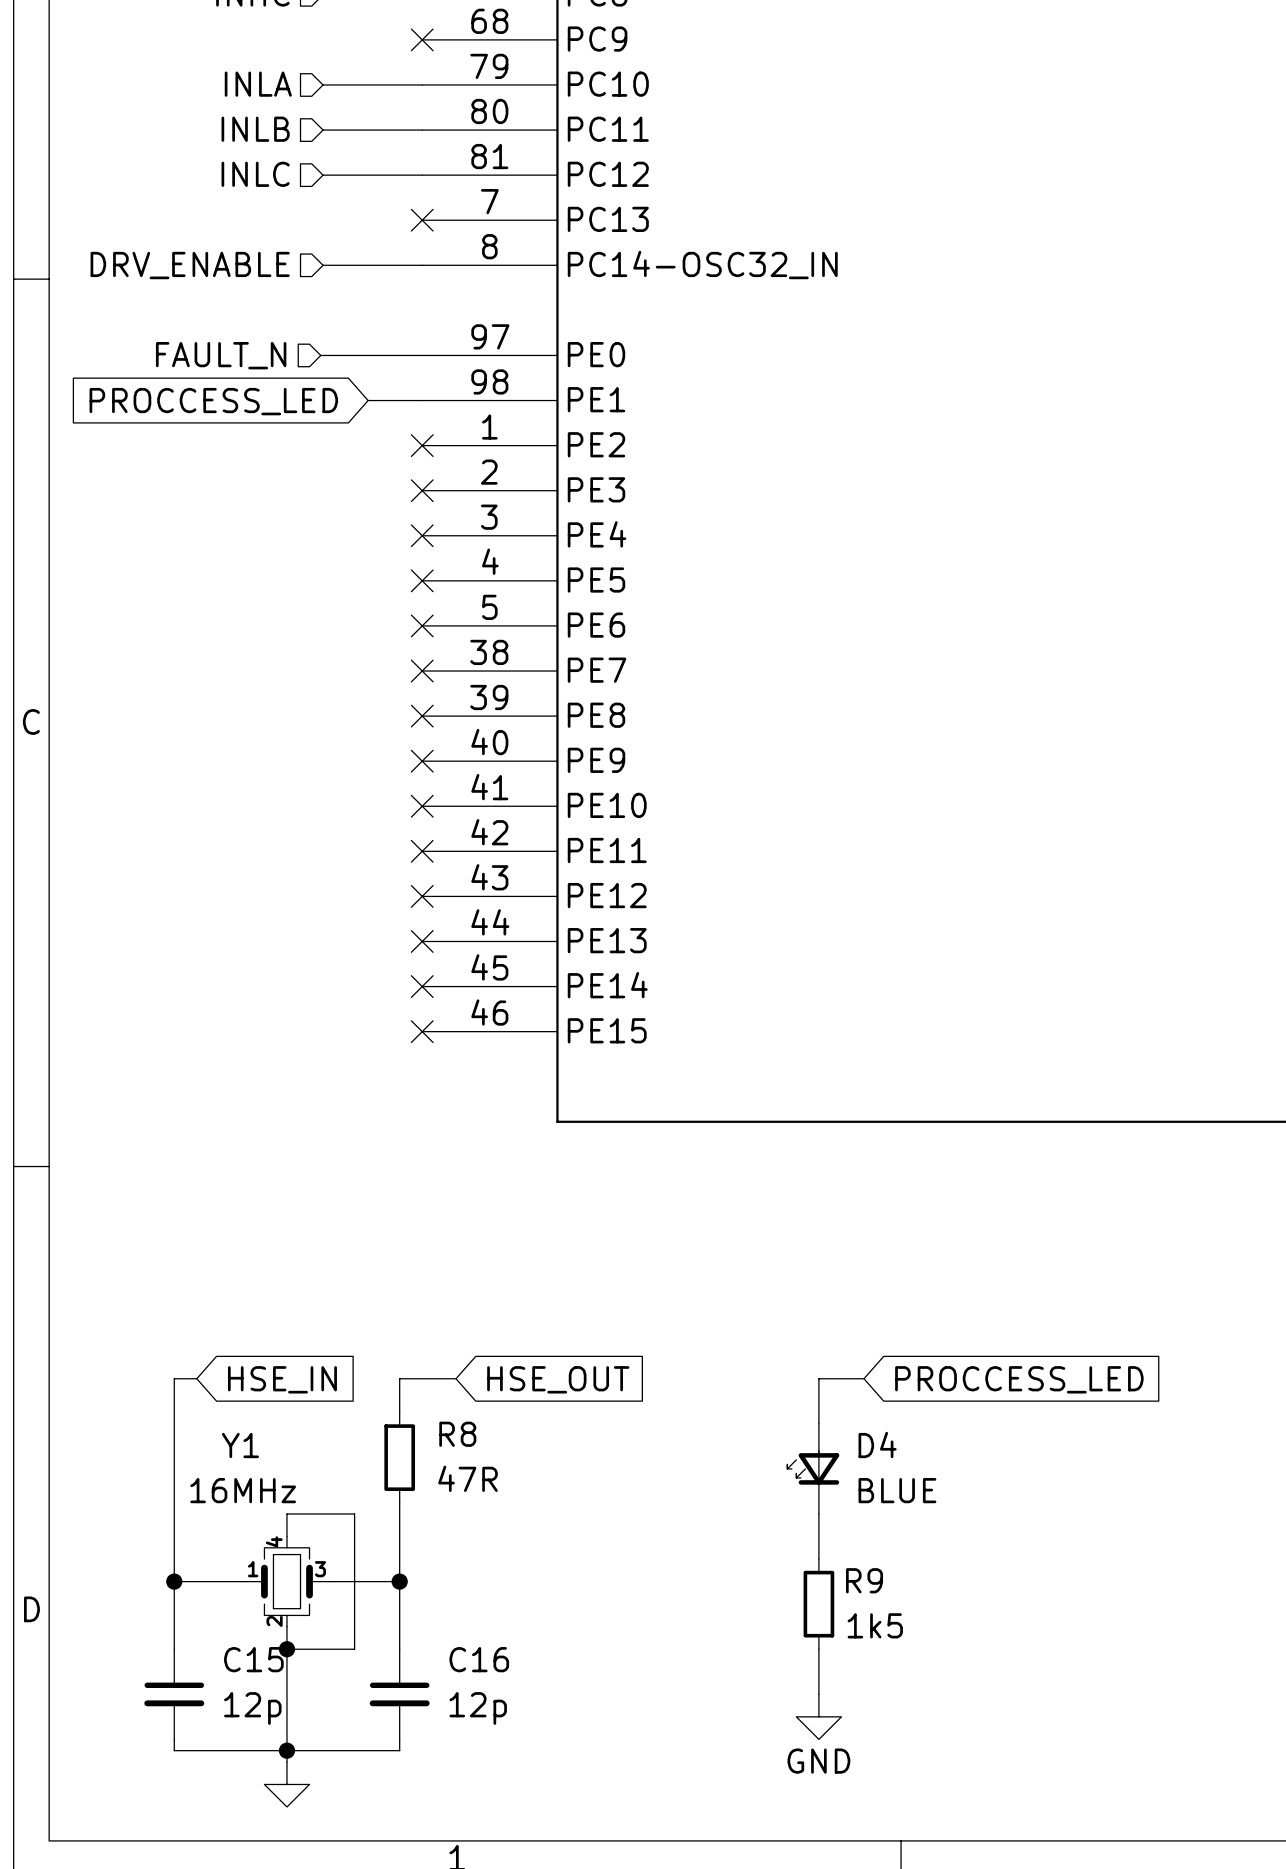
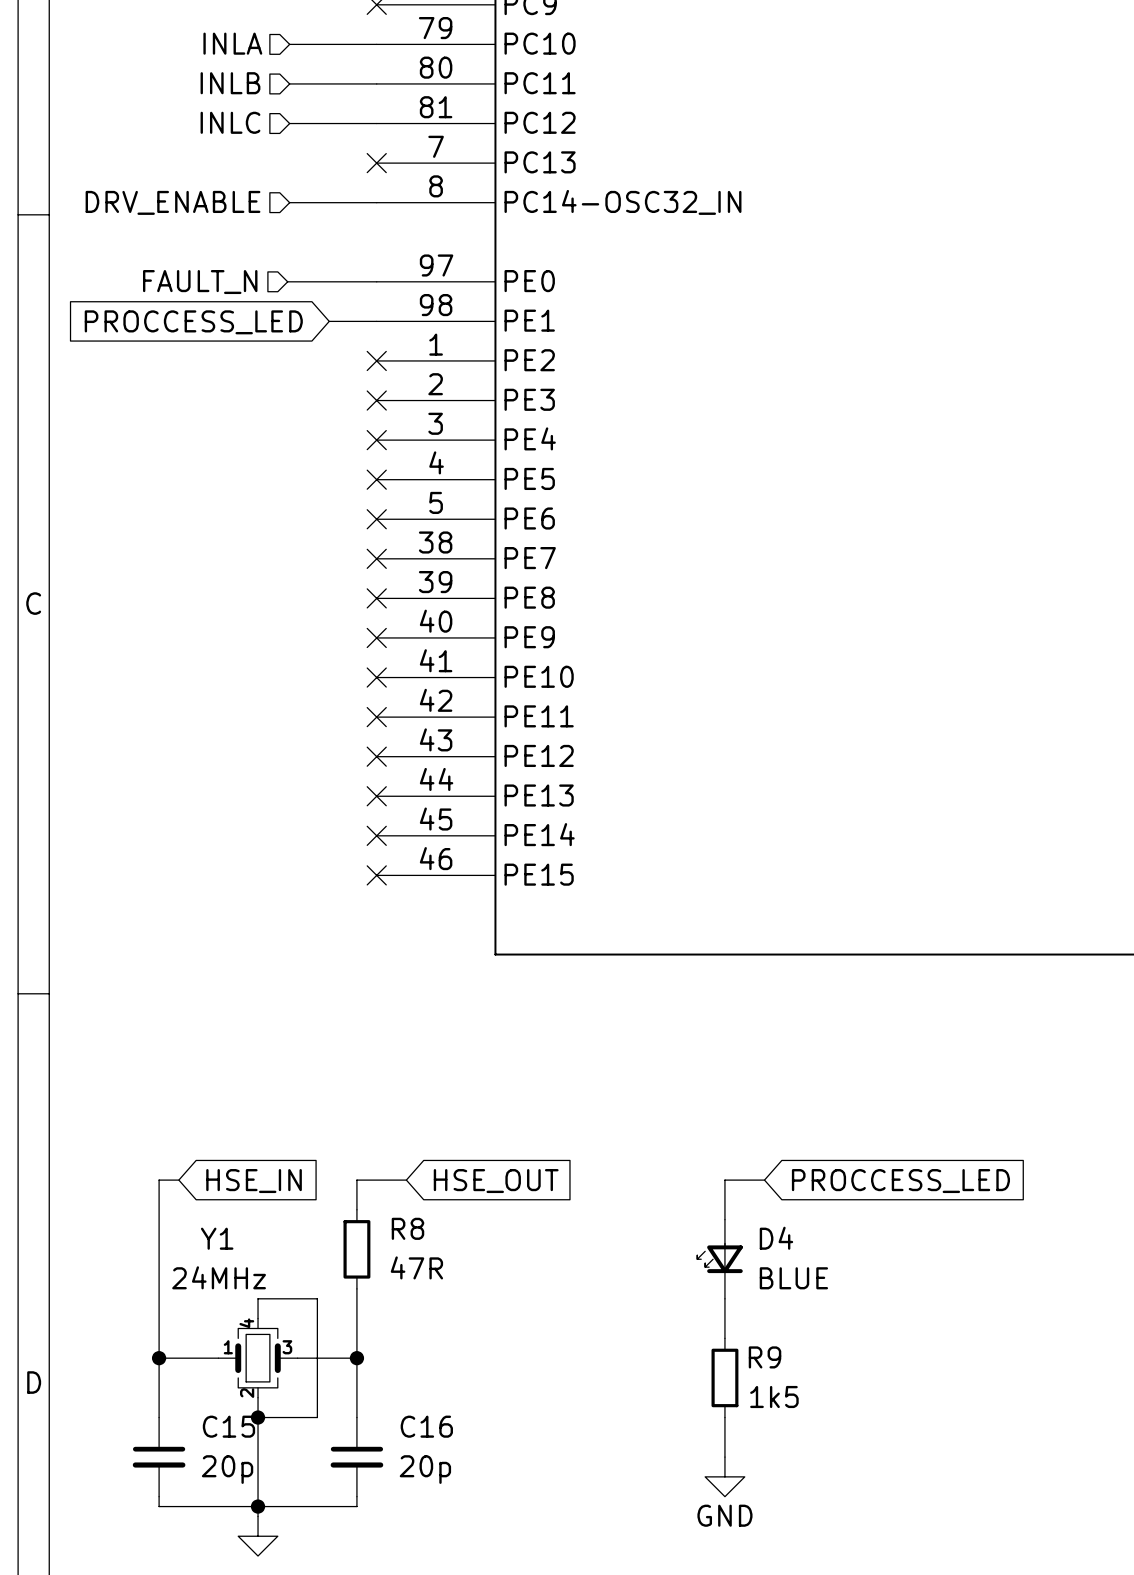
Y1 value: 16MHz (243, 1490) -> 24MHz (219, 1277)
C15 value: 12p (252, 1708) -> 20p (227, 1469)
C16 value: 12p (478, 1708) -> 20p (425, 1469)

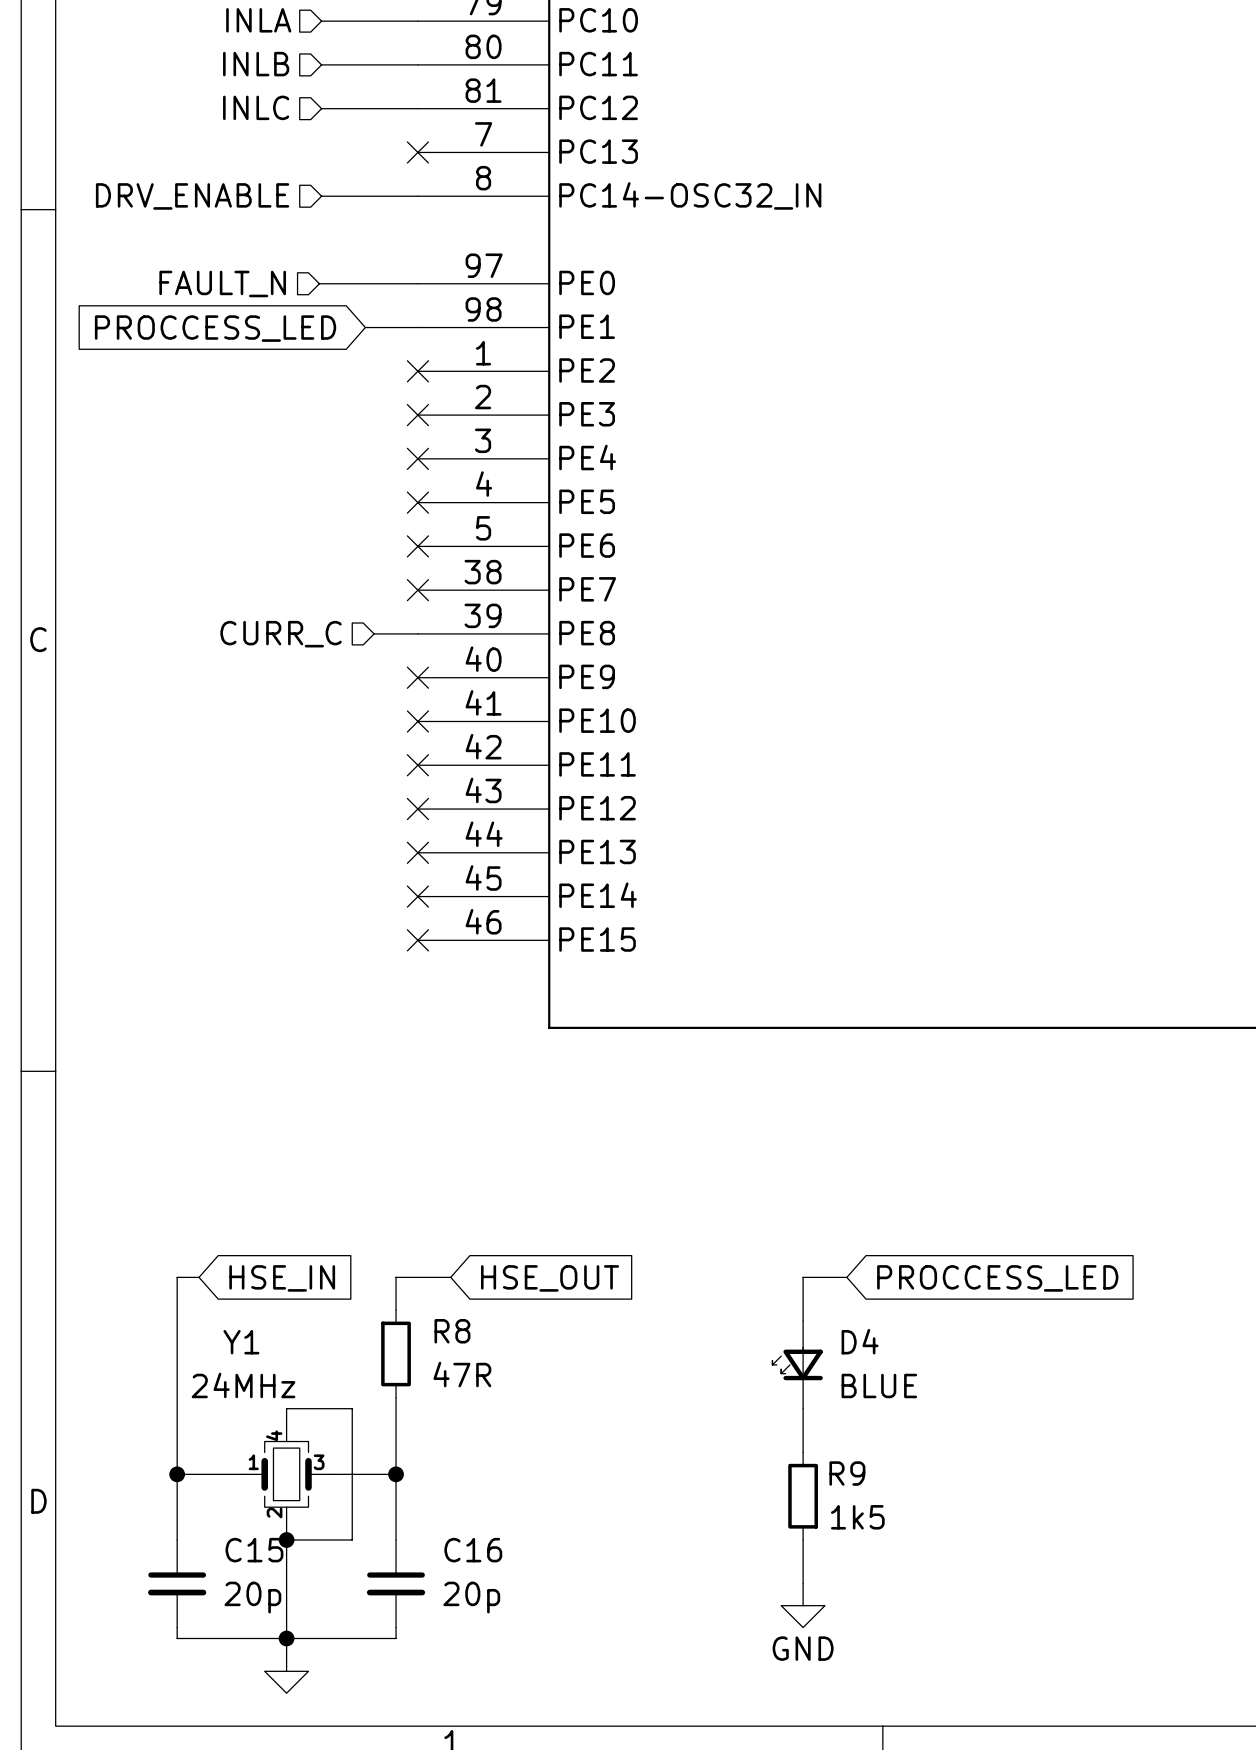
hierarchical label: none -> CURR_C (281, 634)
wire: none -> (374, 633) (417, 633)
no-connect mark: (376, 598) -> none

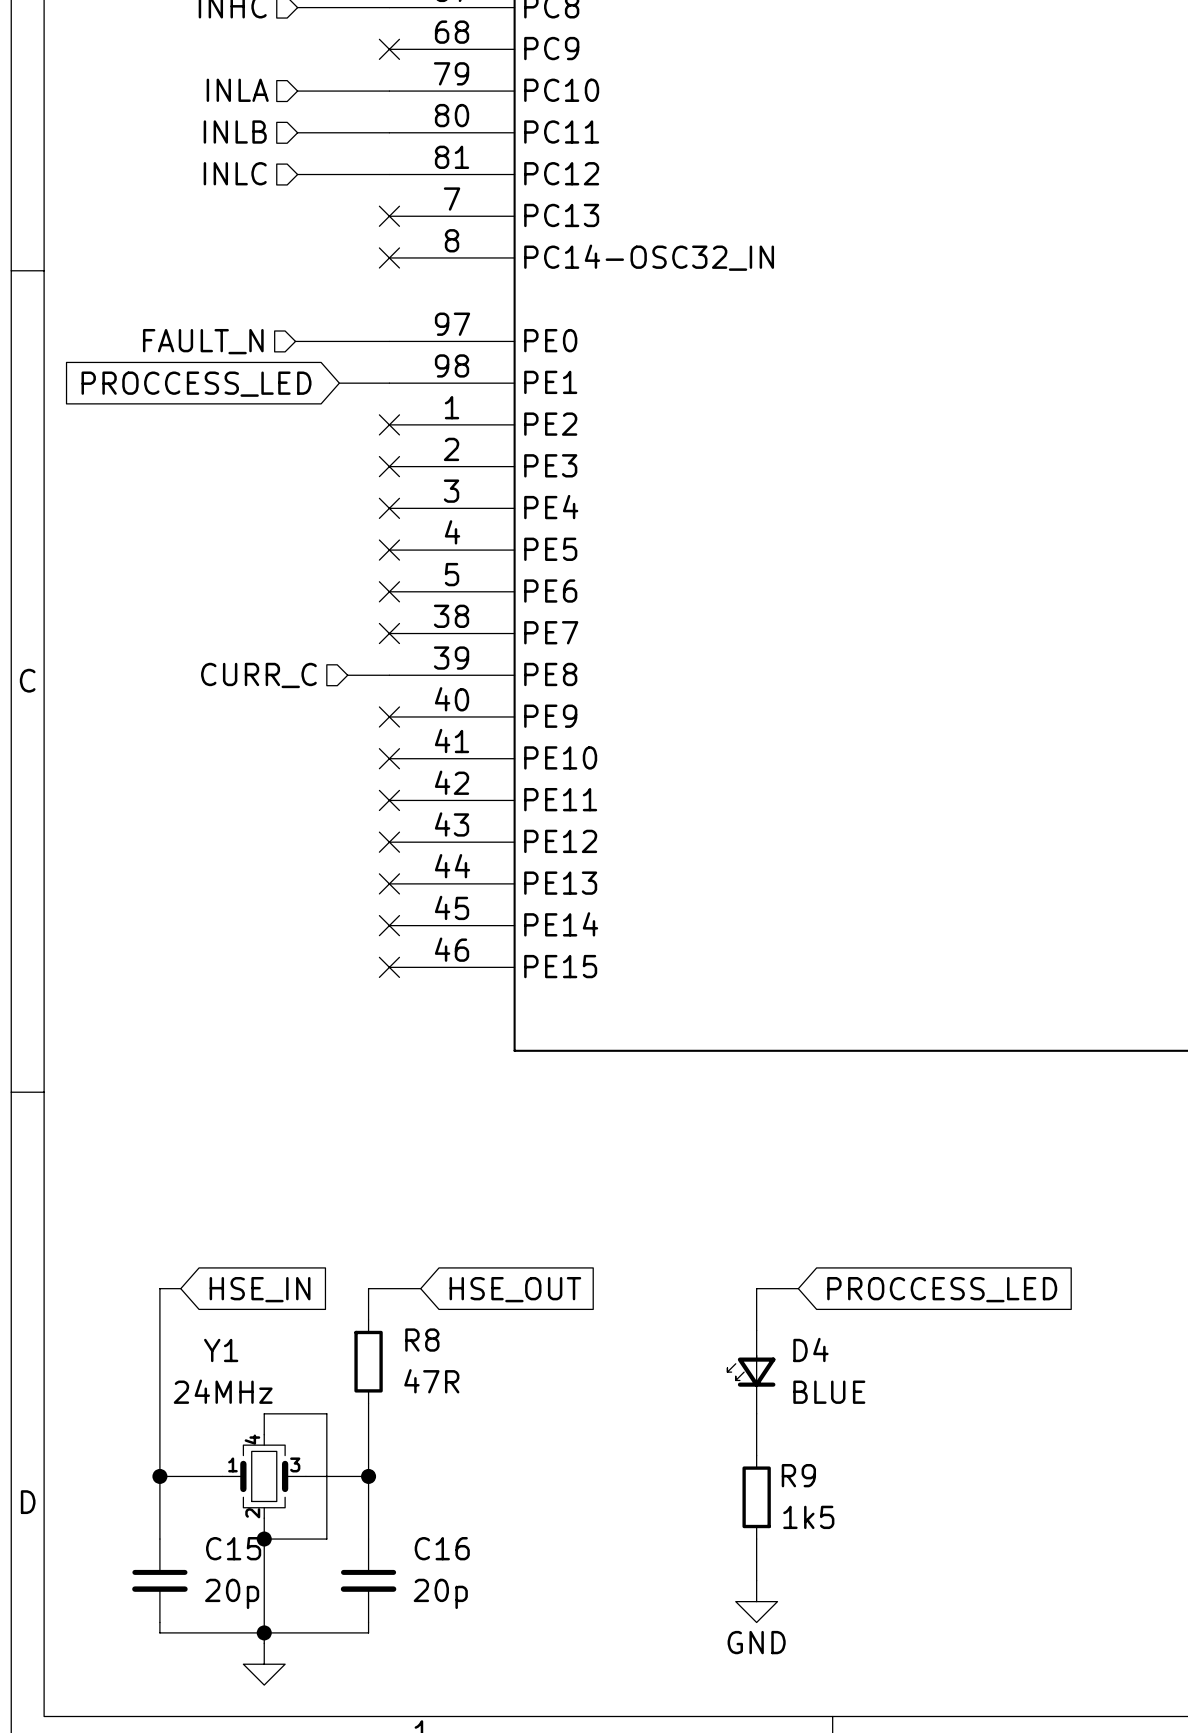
hierarchical label: DRV_ENABLE (192, 196) -> none
wire: (321, 196) (417, 196) -> none
no-connect mark: none -> (389, 257)

